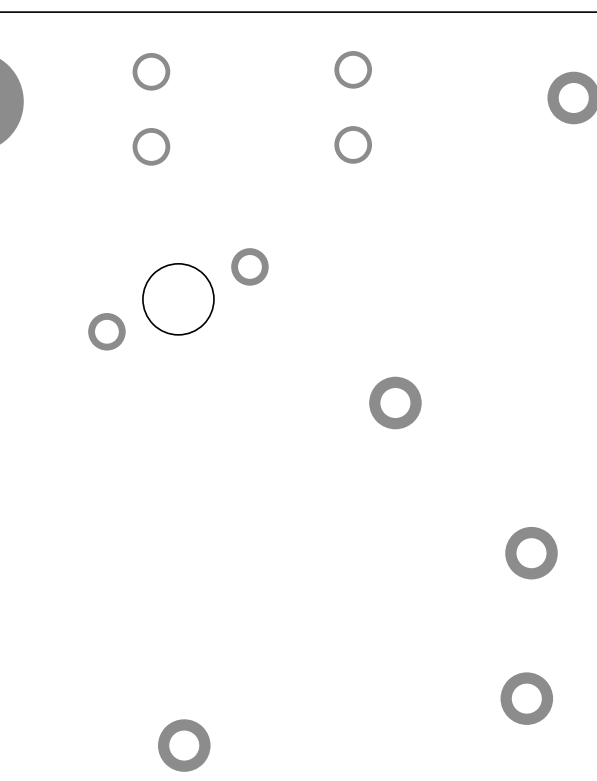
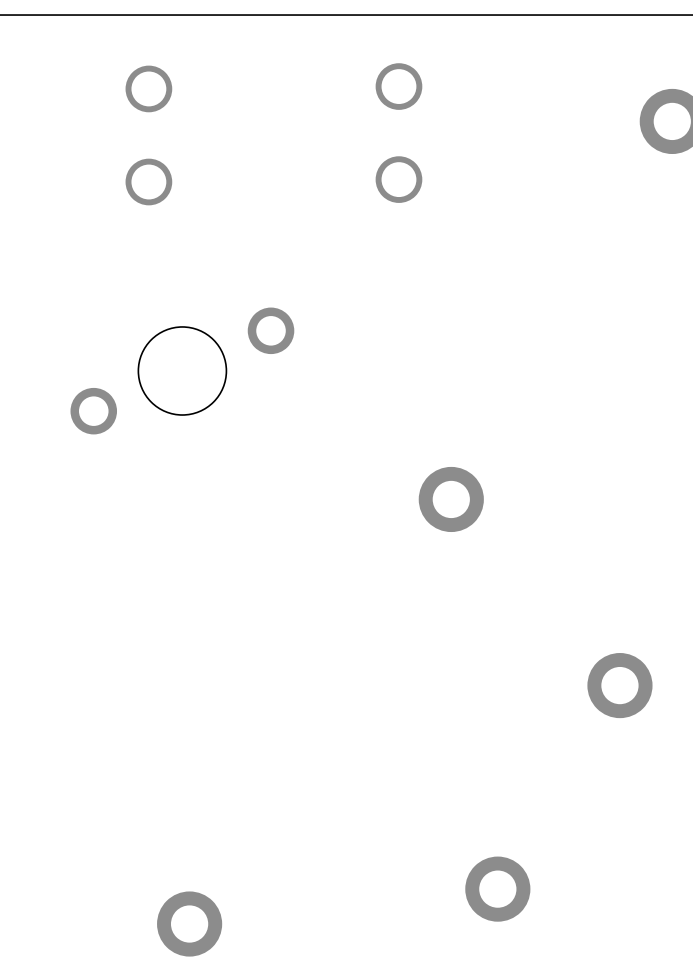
part position: (526, 698) -> (497, 889)

